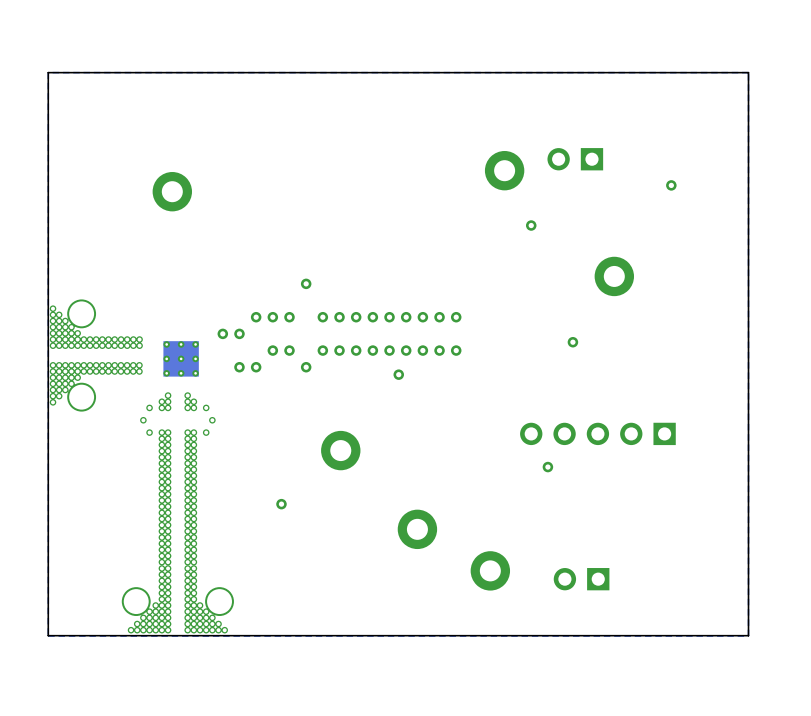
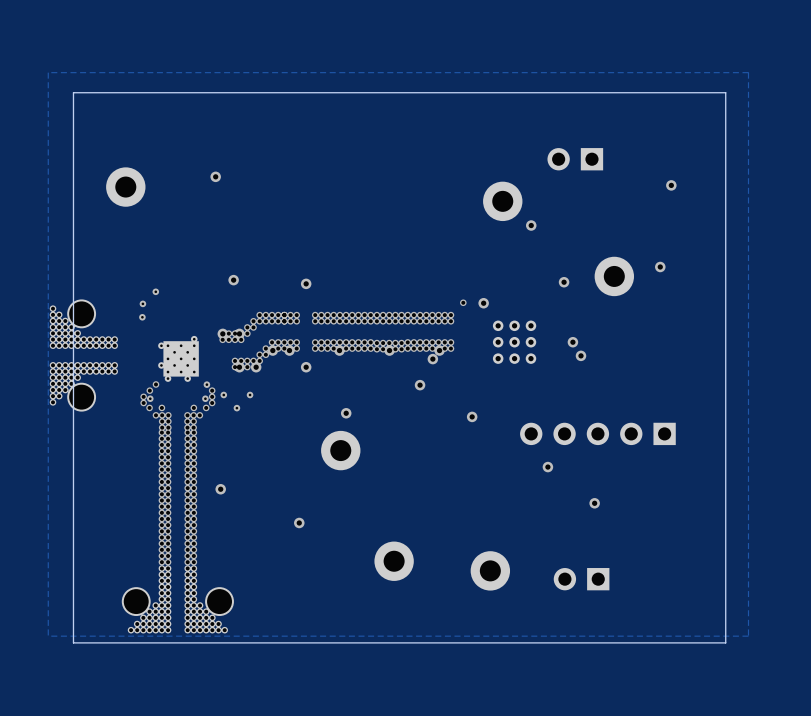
board edge: (748, 72) (48, 72) (48, 635) (748, 635) (748, 72) -> (725, 92) (725, 642) (73, 642) (73, 92) (725, 92)
part position: (504, 170) -> (502, 201)
via: none -> (215, 176)
part position: (172, 191) -> (125, 187)
via: none -> (660, 266)
via: none -> (233, 280)
via: none -> (564, 282)
via: none -> (155, 291)
via: none -> (463, 302)
via: none -> (142, 303)
via: none -> (483, 303)
via: none -> (259, 315)
via: none -> (265, 315)
via: none -> (272, 315)
via: none -> (278, 315)
via: none -> (284, 315)
via: none -> (290, 315)
via: none -> (296, 315)
via: none -> (315, 315)
via: none -> (321, 315)
via: none -> (327, 315)
via: none -> (333, 315)
via: none -> (339, 315)
via: none -> (346, 315)
via: none -> (352, 315)
via: none -> (358, 315)
via: none -> (364, 315)
via: none -> (370, 315)
via: none -> (376, 315)
via: none -> (383, 315)
via: none -> (389, 315)
via: none -> (395, 315)
via: none -> (401, 315)
via: none -> (407, 315)
via: none -> (413, 315)
via: none -> (420, 315)
via: none -> (426, 315)
via: none -> (432, 315)
via: none -> (438, 315)
via: none -> (444, 315)
via: none -> (450, 315)
via: none -> (142, 317)
via: (256, 317) -> none
via: (272, 317) -> none
via: (289, 317) -> none
via: (322, 317) -> none
via: (339, 317) -> none
via: (356, 317) -> none
via: (372, 317) -> none
via: (389, 317) -> none
via: (406, 317) -> none
via: (422, 317) -> none
via: (439, 317) -> none
via: (456, 317) -> none
via: none -> (253, 321)
via: none -> (259, 321)
via: none -> (265, 321)
via: none -> (272, 321)
via: none -> (278, 321)
via: none -> (284, 321)
via: none -> (290, 321)
via: none -> (296, 321)
via: none -> (315, 321)
via: none -> (321, 321)
via: none -> (327, 321)
via: none -> (333, 321)
via: none -> (339, 321)
via: none -> (346, 321)
via: none -> (352, 321)
via: none -> (358, 321)
via: none -> (364, 321)
via: none -> (370, 321)
via: none -> (376, 321)
via: none -> (383, 321)
via: none -> (389, 321)
via: none -> (395, 321)
via: none -> (401, 321)
via: none -> (407, 321)
via: none -> (413, 321)
via: none -> (420, 321)
via: none -> (426, 321)
via: none -> (432, 321)
via: none -> (438, 321)
via: none -> (444, 321)
via: none -> (450, 321)
via: none -> (247, 327)
via: none -> (253, 327)
via: none -> (228, 333)
via: none -> (235, 333)
via: none -> (247, 333)
via: (121, 339) -> none
via: (127, 339) -> none
via: (133, 339) -> none
via: (139, 339) -> none
via: none -> (222, 339)
via: none -> (228, 339)
via: none -> (235, 339)
via: none -> (241, 339)
part footprint: [163, 341, 199, 377] -> [158, 335, 199, 382]
via: none -> (272, 342)
via: none -> (278, 342)
via: none -> (284, 342)
via: none -> (290, 342)
via: none -> (296, 342)
via: none -> (315, 342)
via: none -> (321, 342)
via: none -> (327, 342)
via: none -> (333, 342)
via: none -> (339, 342)
via: none -> (346, 342)
via: none -> (352, 342)
via: none -> (358, 342)
via: none -> (364, 342)
via: none -> (370, 342)
via: none -> (407, 342)
via: none -> (413, 342)
via: none -> (420, 342)
via: none -> (426, 342)
via: none -> (432, 342)
via: none -> (438, 342)
via: none -> (444, 342)
via: none -> (450, 342)
part: none -> (514, 342)
via: none -> (376, 343)
via: none -> (383, 343)
via: none -> (389, 343)
via: none -> (395, 343)
via: none -> (401, 343)
via: (121, 345) -> none
via: (127, 345) -> none
via: (133, 345) -> none
via: (139, 345) -> none
via: none -> (265, 348)
via: none -> (278, 348)
via: none -> (284, 348)
via: none -> (296, 348)
via: none -> (315, 348)
via: none -> (321, 348)
via: none -> (327, 348)
via: none -> (333, 348)
via: none -> (346, 348)
via: none -> (352, 348)
via: none -> (358, 348)
via: none -> (364, 348)
via: none -> (370, 348)
via: none -> (407, 348)
via: none -> (413, 348)
via: none -> (420, 348)
via: none -> (426, 348)
via: none -> (432, 348)
via: none -> (444, 348)
via: none -> (450, 348)
via: none -> (376, 349)
via: none -> (383, 349)
via: none -> (395, 349)
via: none -> (401, 349)
via: (322, 350) -> none
via: (356, 350) -> none
via: (372, 350) -> none
via: (406, 350) -> none
via: (422, 350) -> none
via: (456, 350) -> none
via: none -> (259, 354)
via: none -> (265, 354)
via: none -> (580, 355)
via: none -> (432, 359)
via: none -> (235, 360)
via: none -> (241, 360)
via: none -> (247, 360)
via: none -> (253, 360)
via: none -> (259, 360)
via: (120, 365) -> none
via: (127, 365) -> none
via: (133, 365) -> none
via: (139, 365) -> none
via: none -> (235, 367)
via: none -> (247, 367)
via: (120, 371) -> none
via: (127, 371) -> none
via: (133, 371) -> none
via: (139, 371) -> none
via: (398, 374) -> none
via: none -> (155, 384)
via: none -> (206, 384)
via: none -> (420, 385)
via: none -> (149, 390)
via: none -> (212, 390)
via: none -> (223, 394)
via: none -> (250, 394)
via: (168, 395) -> none
via: (187, 395) -> none
via: none -> (143, 396)
via: none -> (212, 396)
via: none -> (150, 398)
via: none -> (205, 398)
via: (161, 401) -> none
via: (168, 401) -> none
via: (187, 401) -> none
via: (193, 401) -> none
via: none -> (143, 403)
via: none -> (212, 403)
via: (168, 407) -> none
via: (187, 407) -> none
via: none -> (236, 408)
via: none -> (346, 413)
via: none -> (155, 415)
via: none -> (162, 415)
via: none -> (168, 415)
via: none -> (187, 415)
via: none -> (193, 415)
via: none -> (199, 415)
via: none -> (472, 416)
via: (143, 420) -> none
via: (212, 420) -> none
via: none -> (162, 421)
via: none -> (168, 421)
via: none -> (187, 421)
via: none -> (193, 421)
via: none -> (162, 427)
via: none -> (168, 427)
via: none -> (187, 427)
via: none -> (193, 427)
via: (149, 432) -> none
via: (206, 432) -> none
via: none -> (220, 489)
via: none -> (594, 503)
via position: (281, 504) -> (299, 522)
part position: (417, 529) -> (394, 561)

